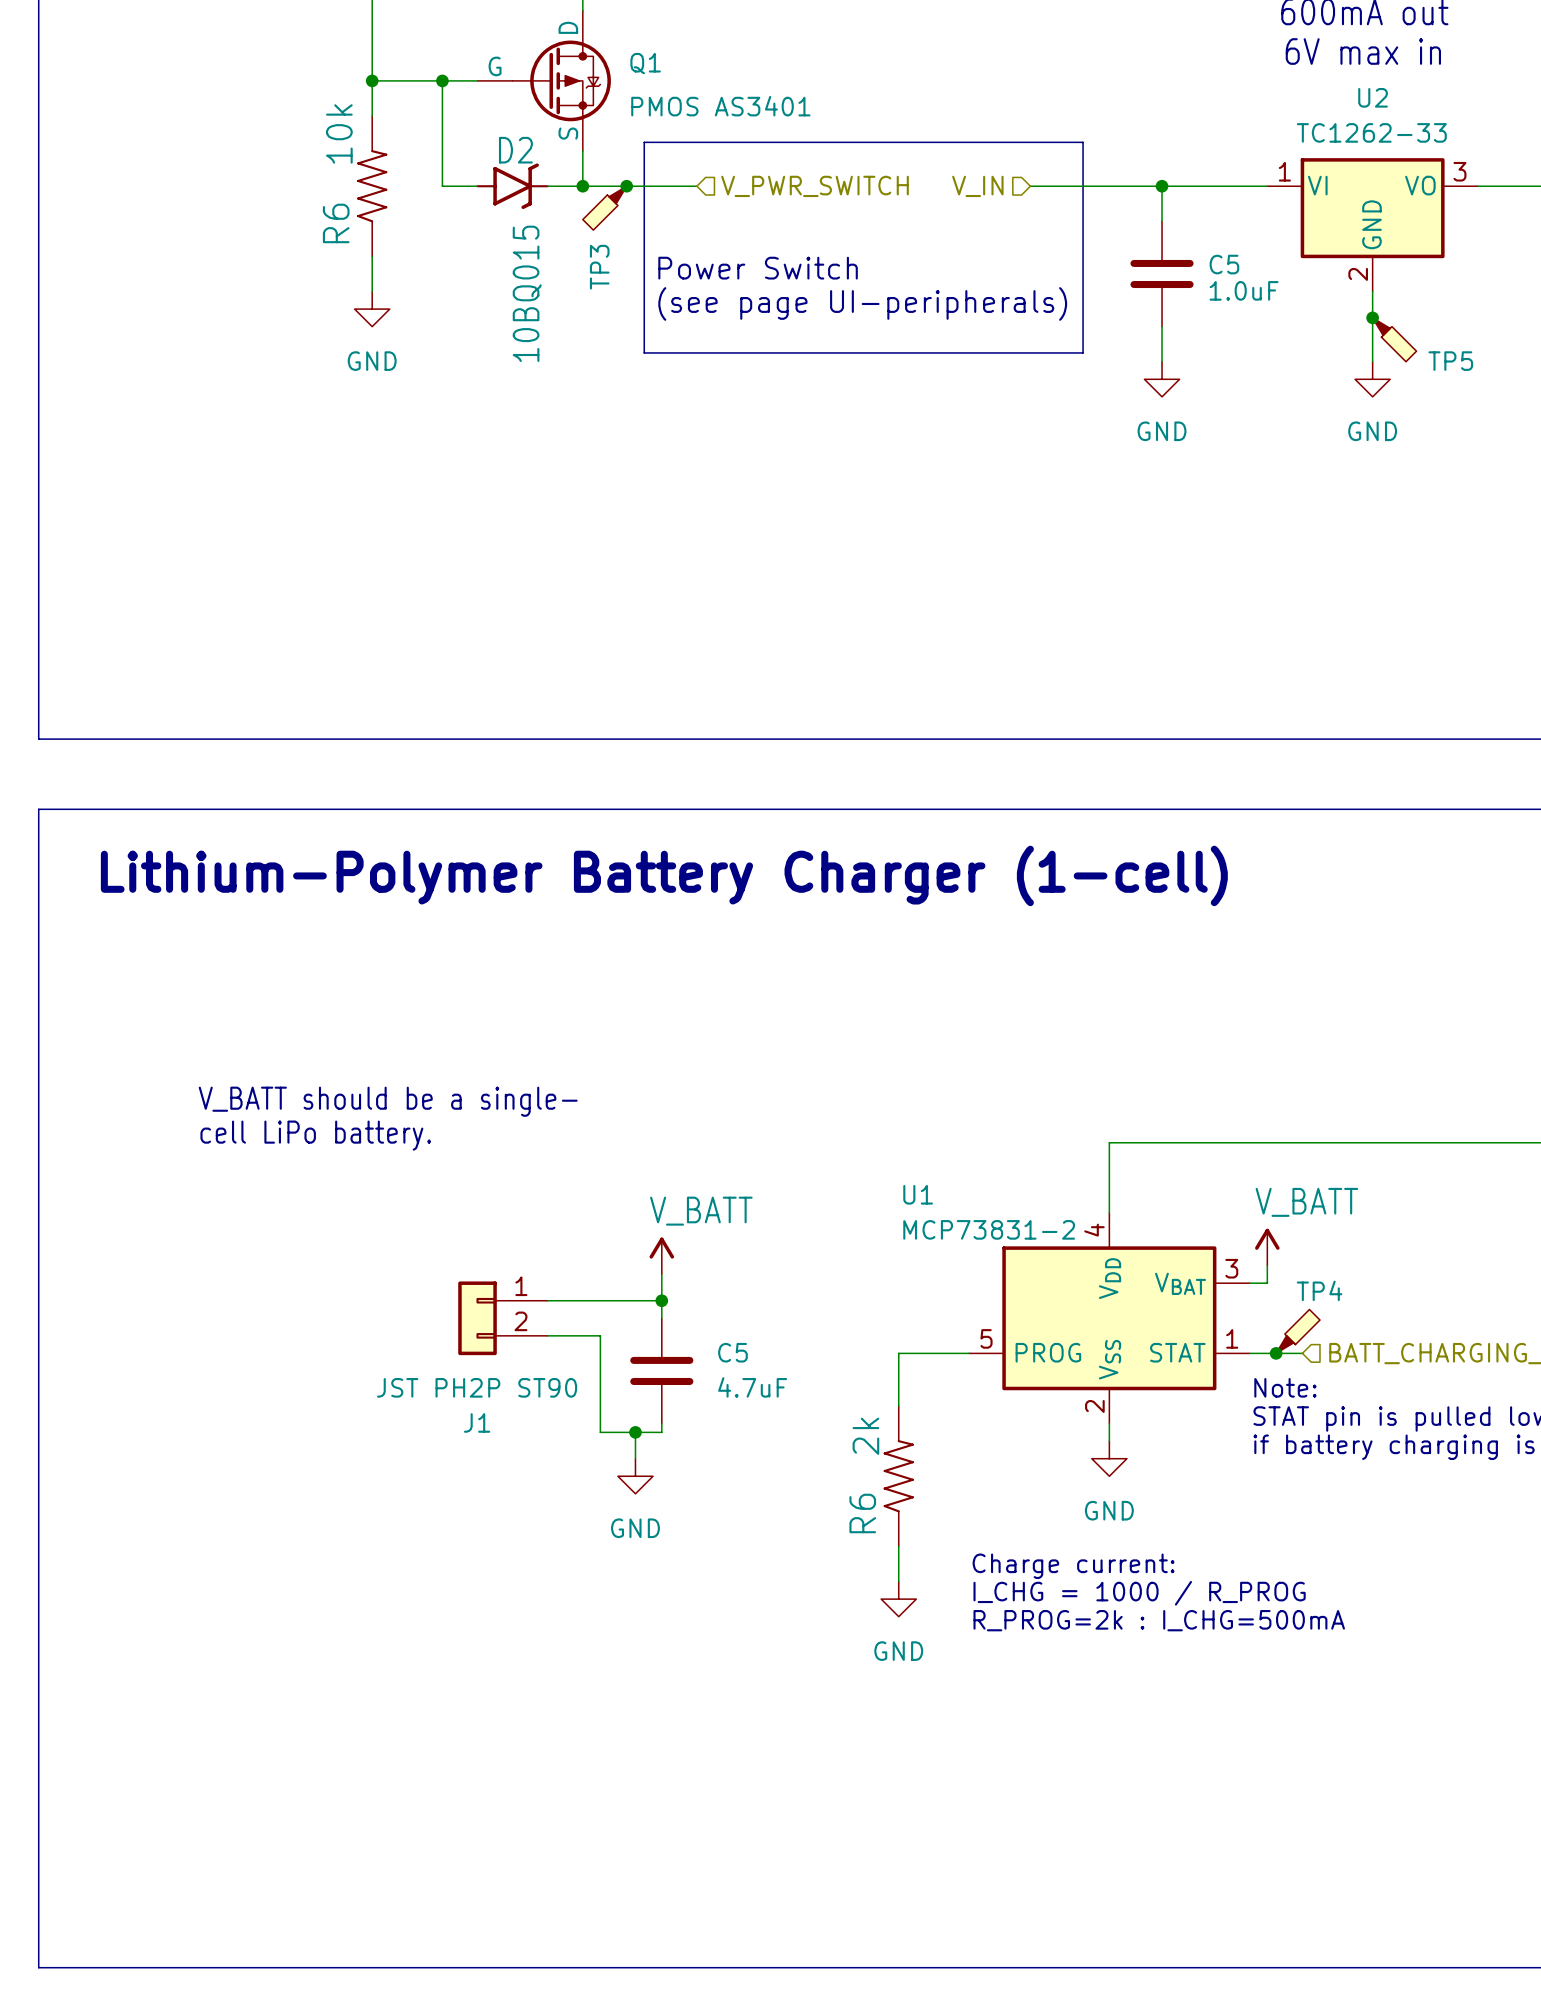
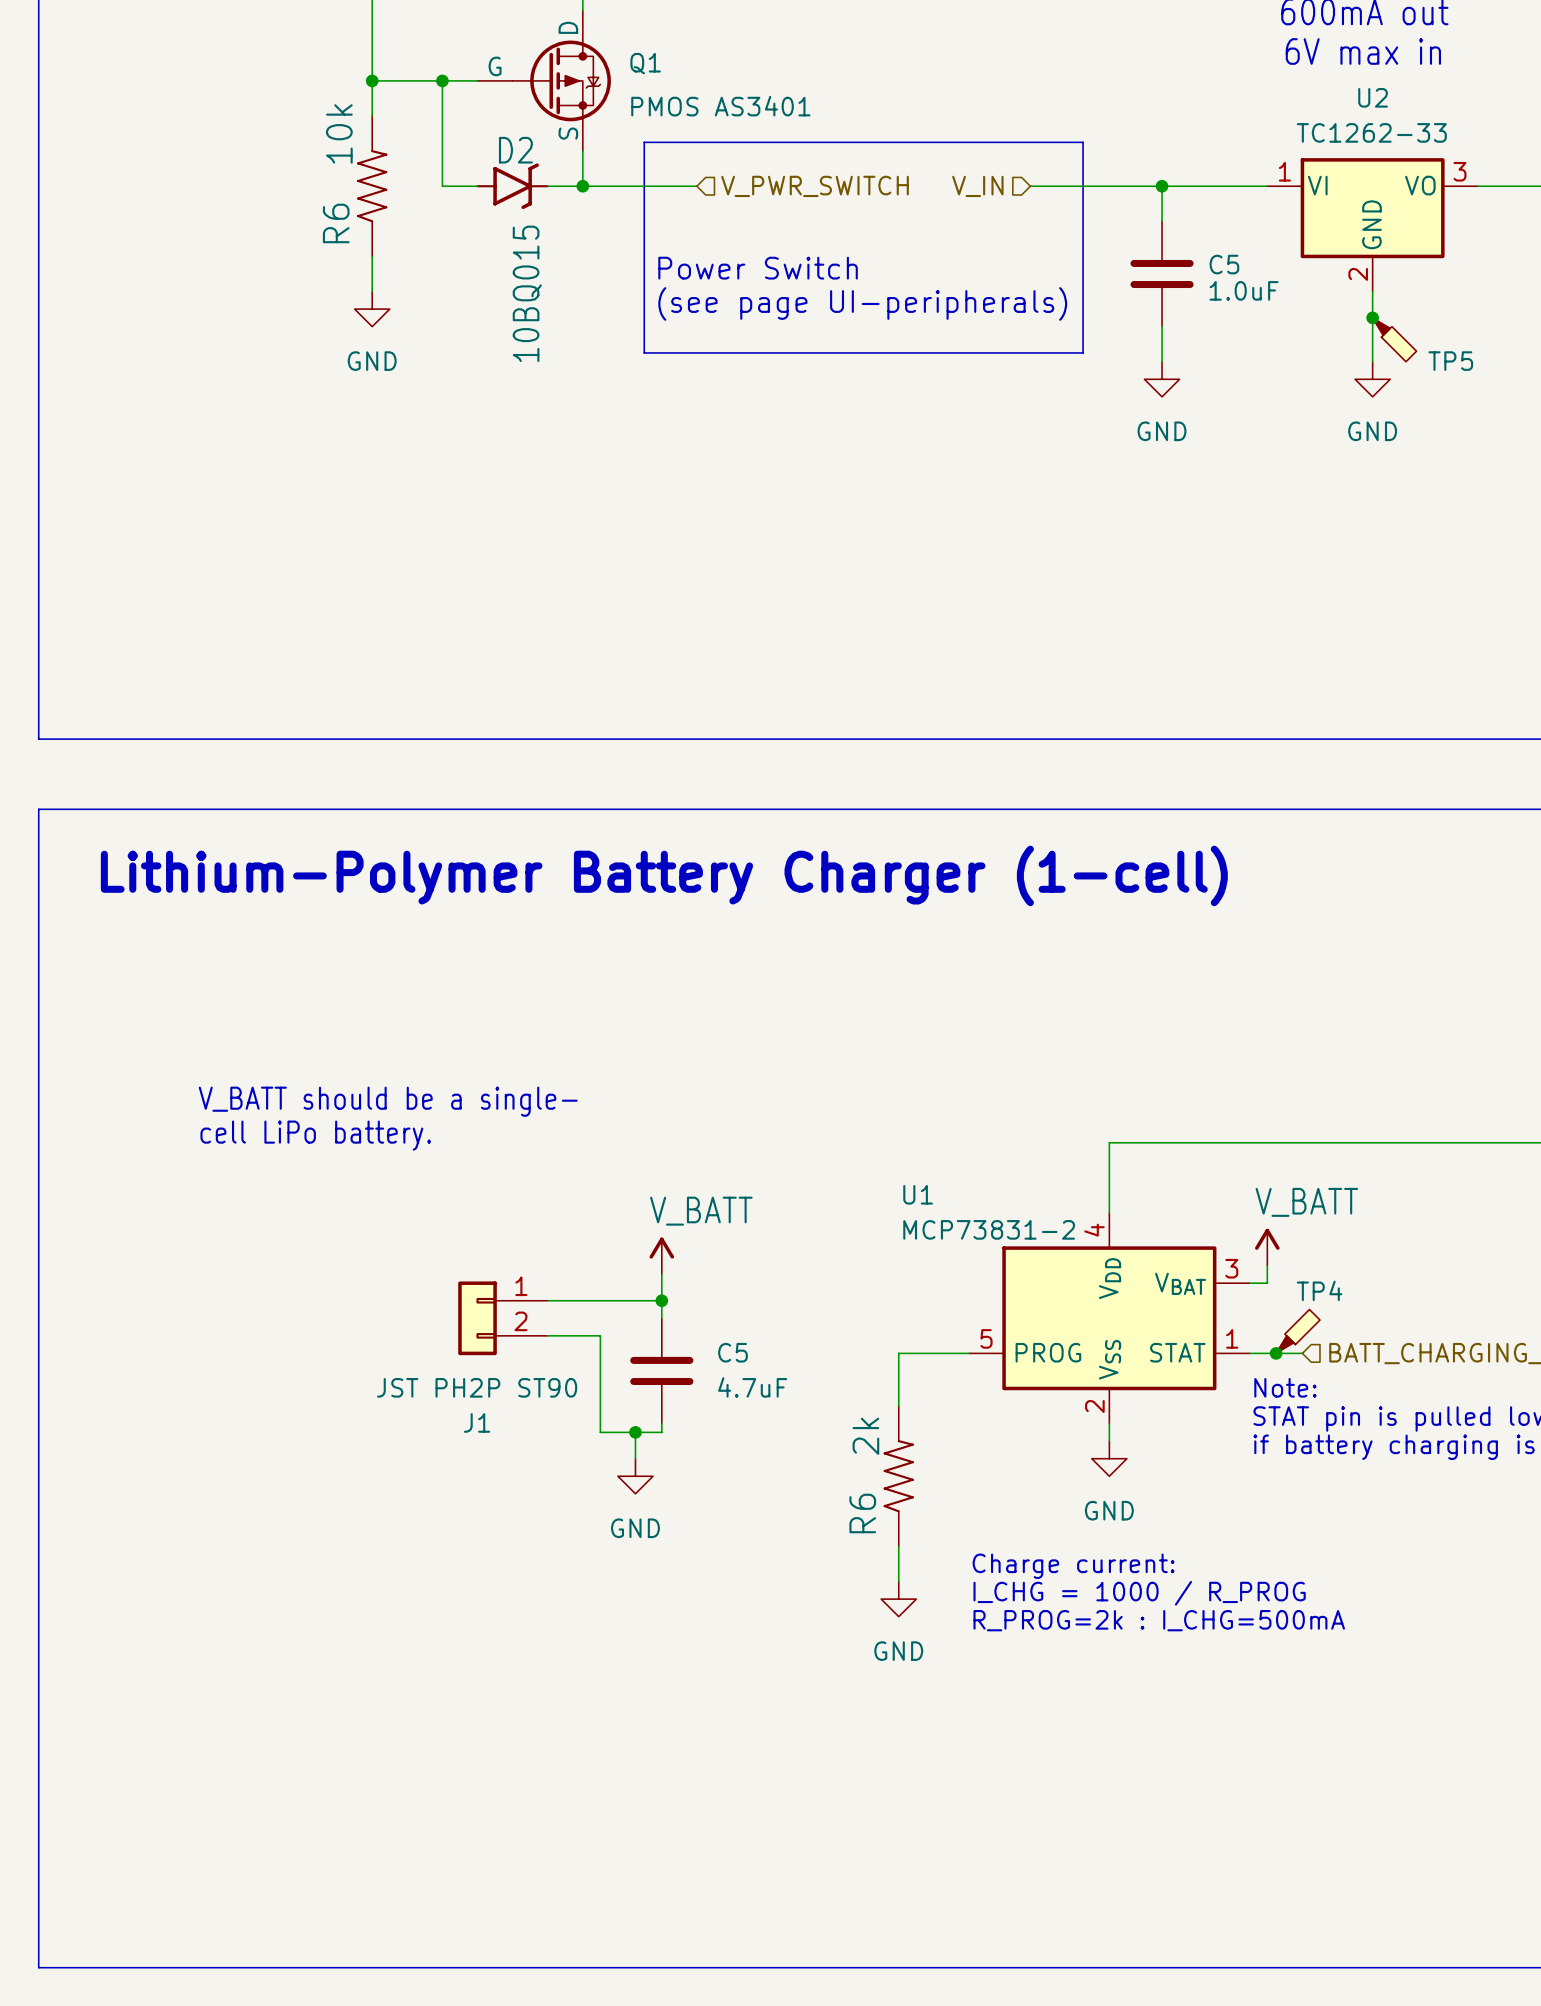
junction: (626, 186) -> none
TP3: (604, 208) -> none

